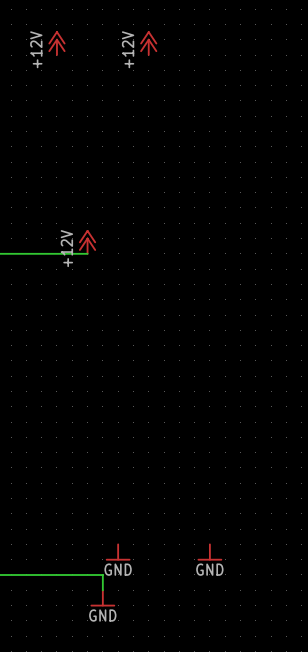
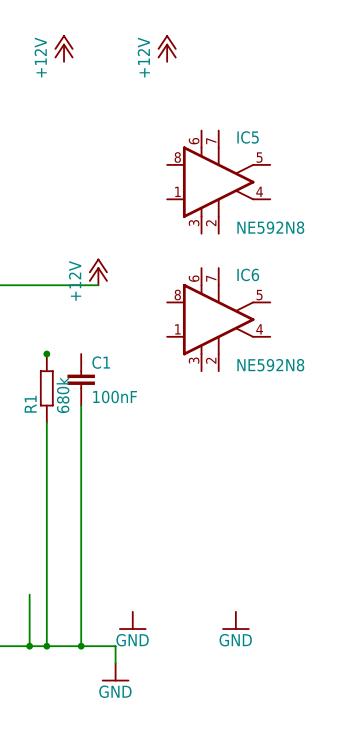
IC5: none -> NE592N8 (218, 182)
IC6: none -> NE592N8 (218, 319)
junction: none -> (46, 354)
C1: none -> 100nF (81, 379)
R1: none -> 680k (46, 388)
wire: none -> (81, 405) (81, 646)
wire: none -> (46, 422) (46, 646)
wire: none -> (29, 594) (29, 646)
junction: none -> (29, 646)
junction: none -> (46, 646)
junction: none -> (81, 646)

